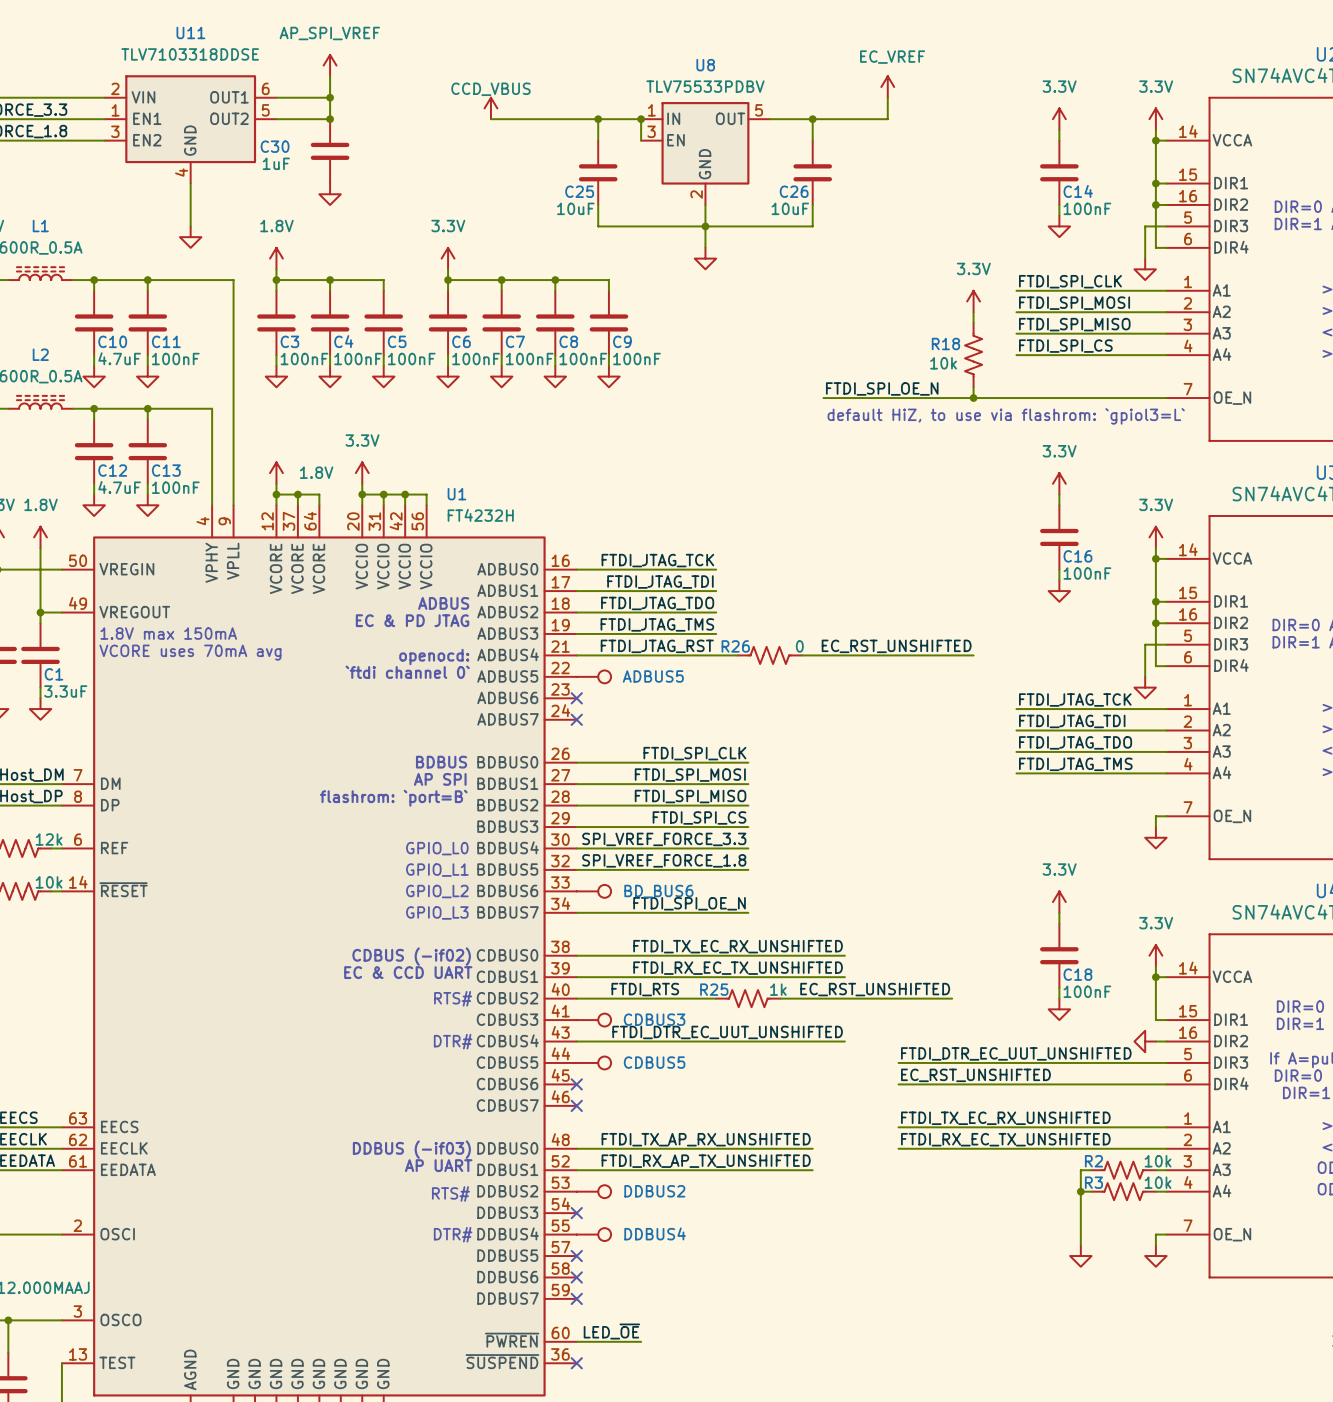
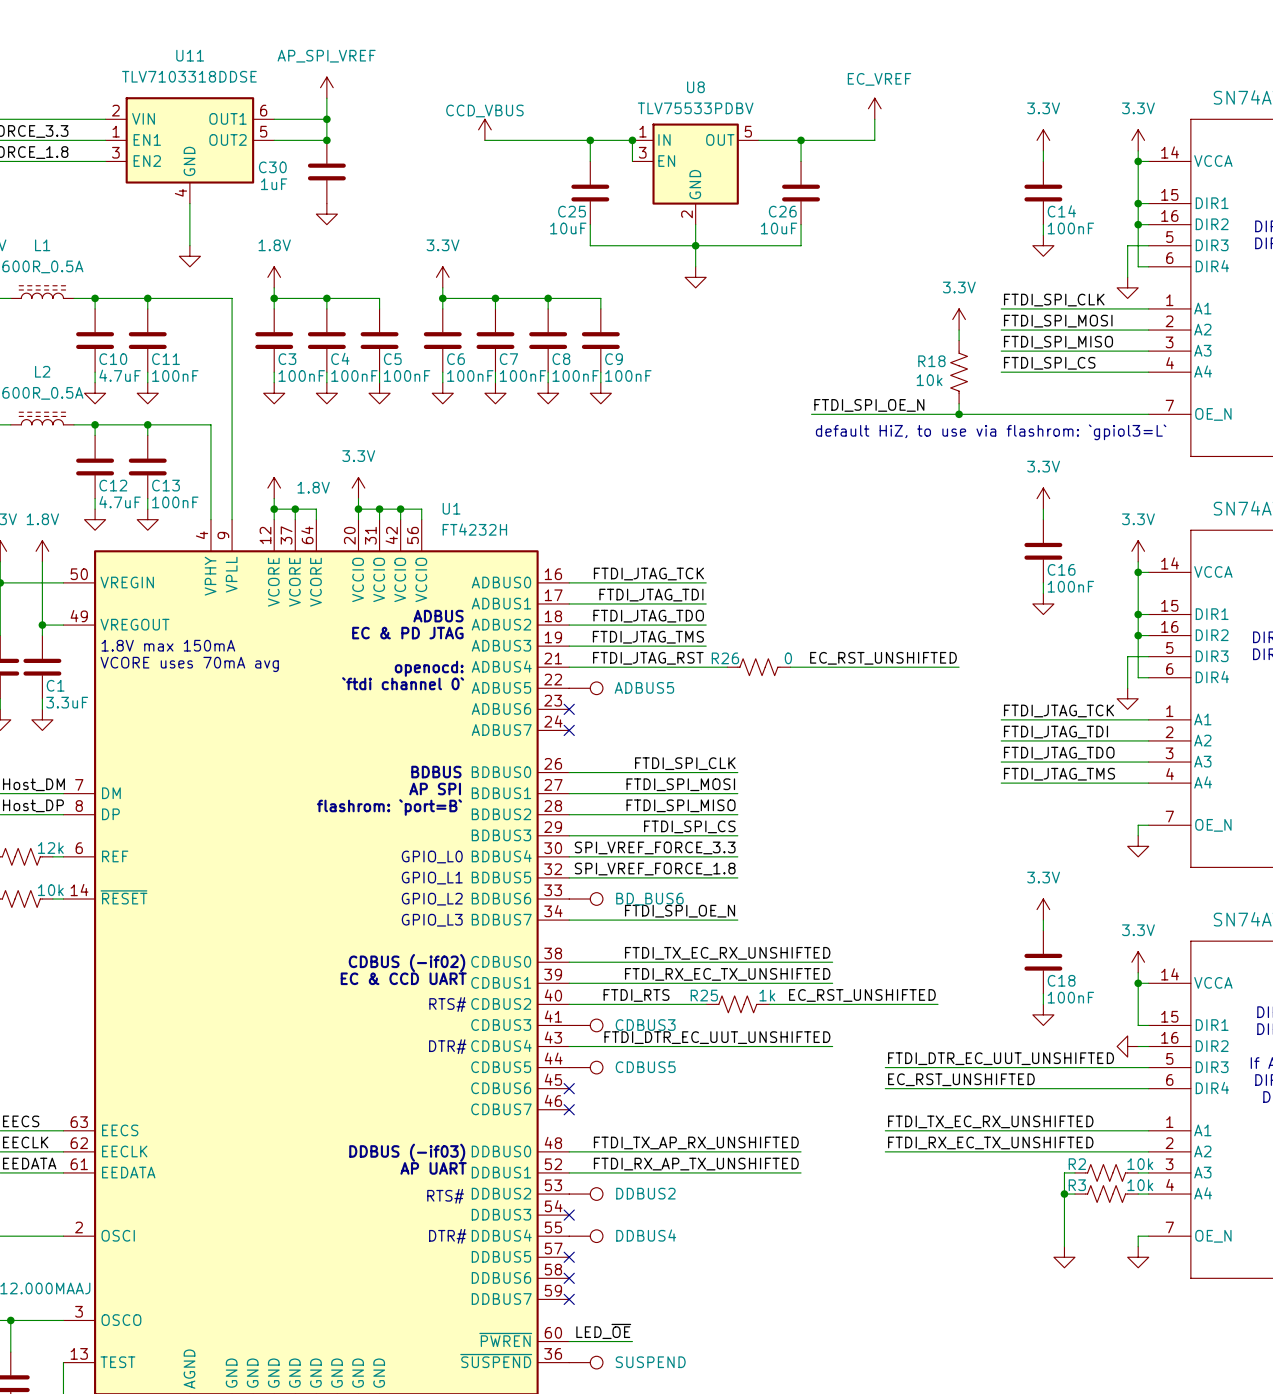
no-connect mark: (576, 1363) -> none
SUSPEND: none -> (586, 1362)

